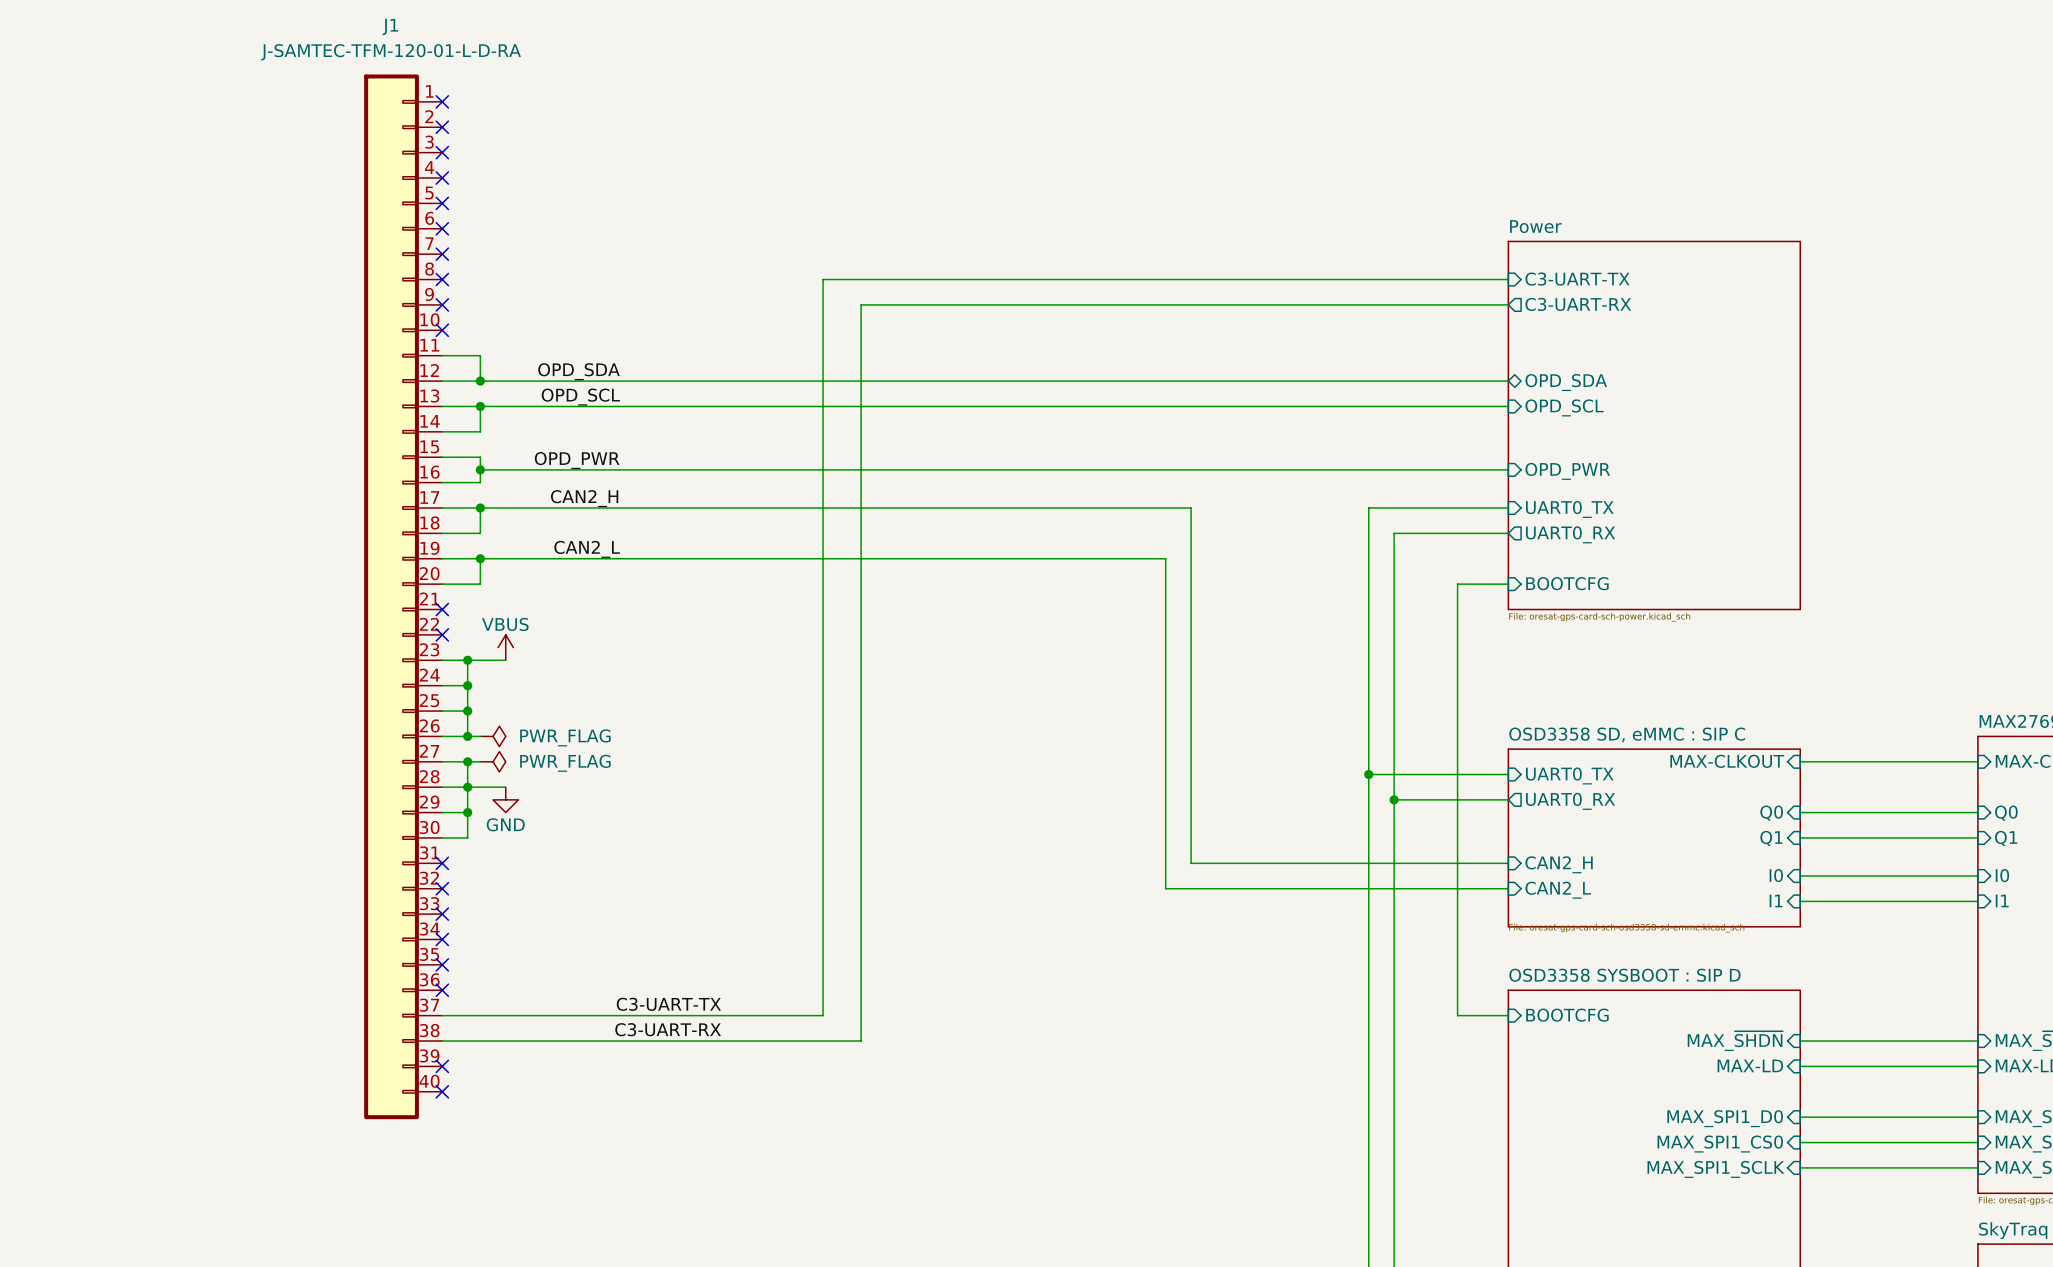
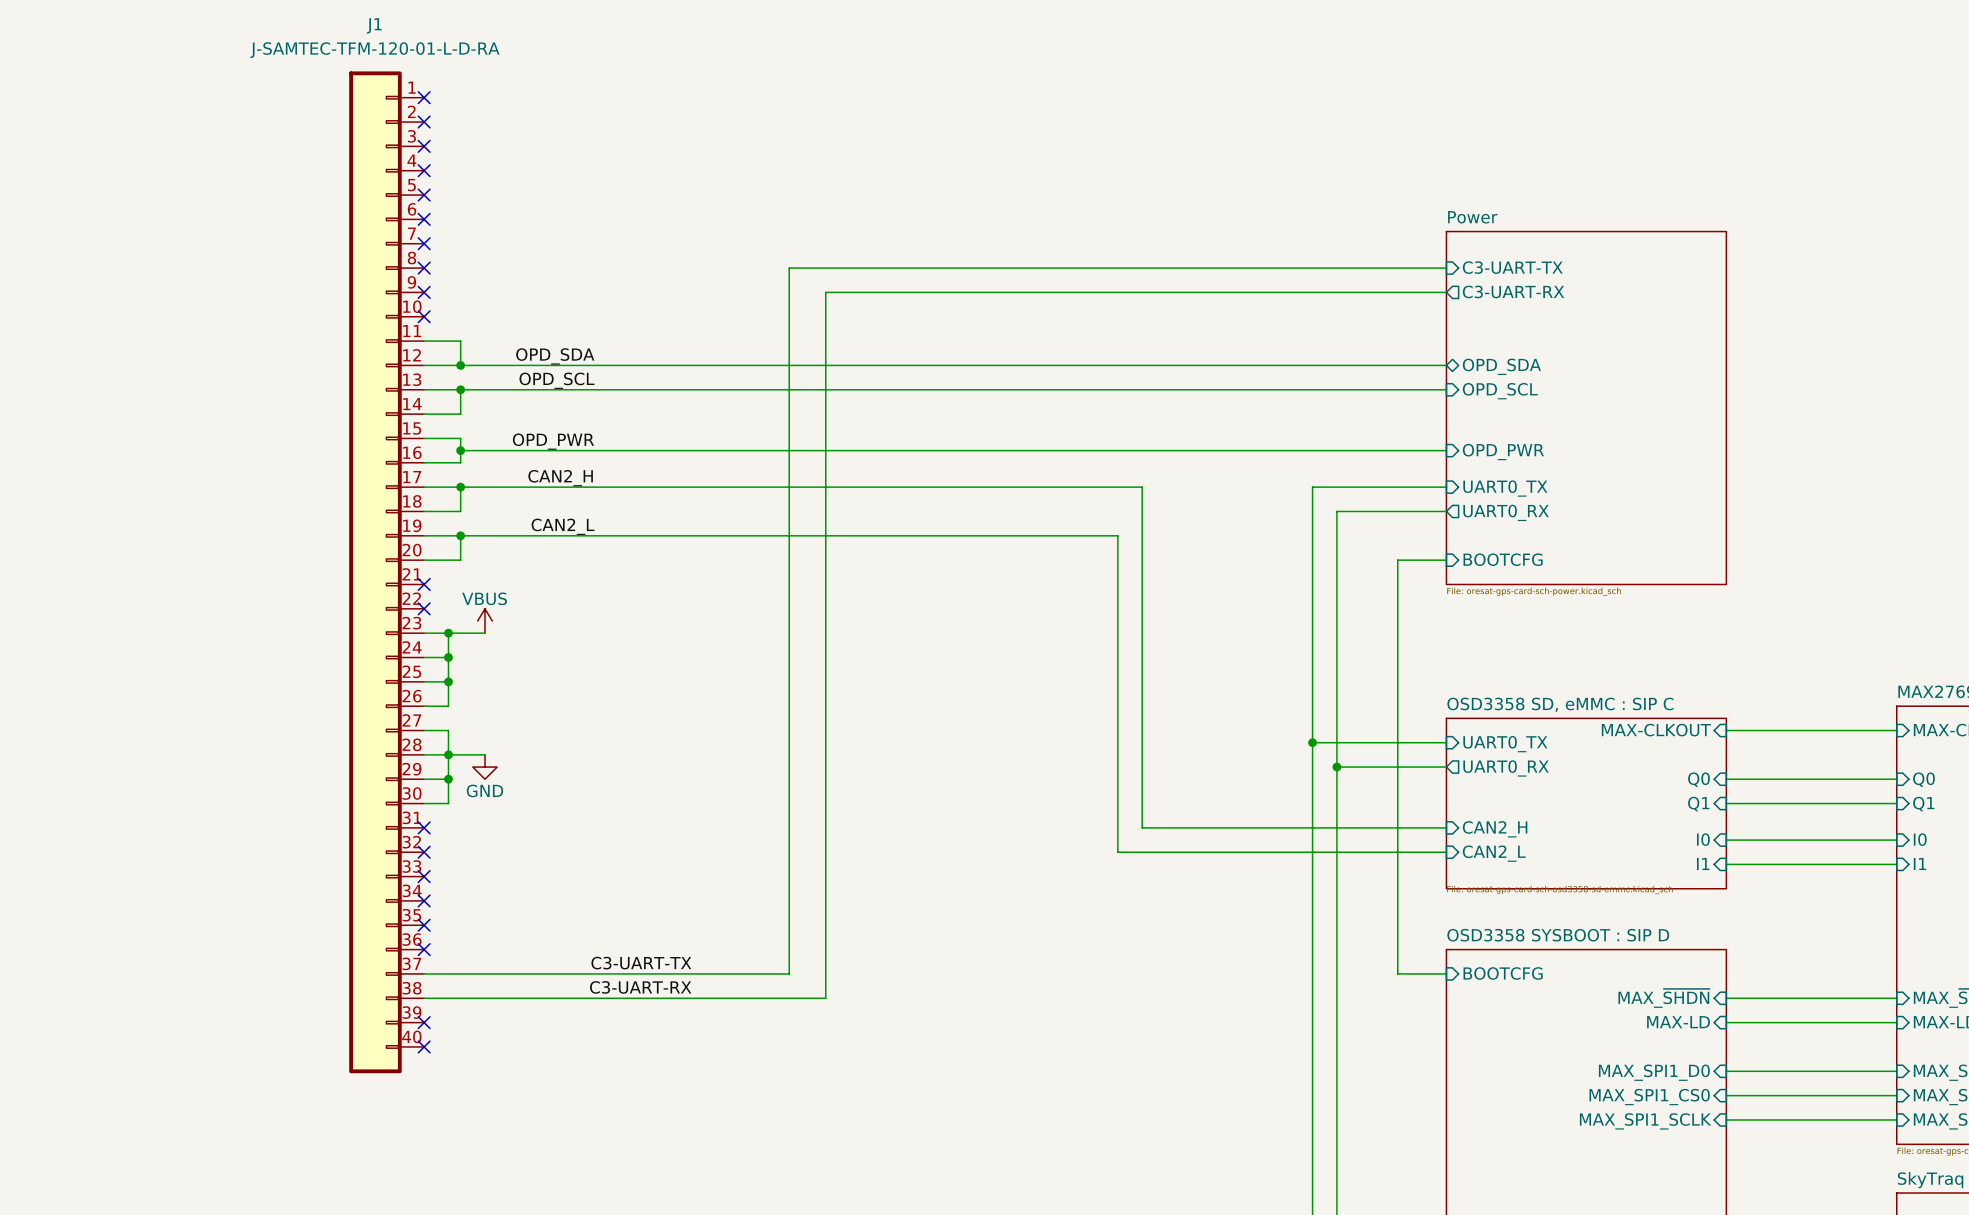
wire: (467, 736) (480, 736) -> none
junction: (467, 736) -> none
power symbol: PWR_FLAG (493, 736) -> none
wire: (467, 761) (480, 761) -> none
junction: (467, 761) -> none
power symbol: PWR_FLAG (493, 761) -> none

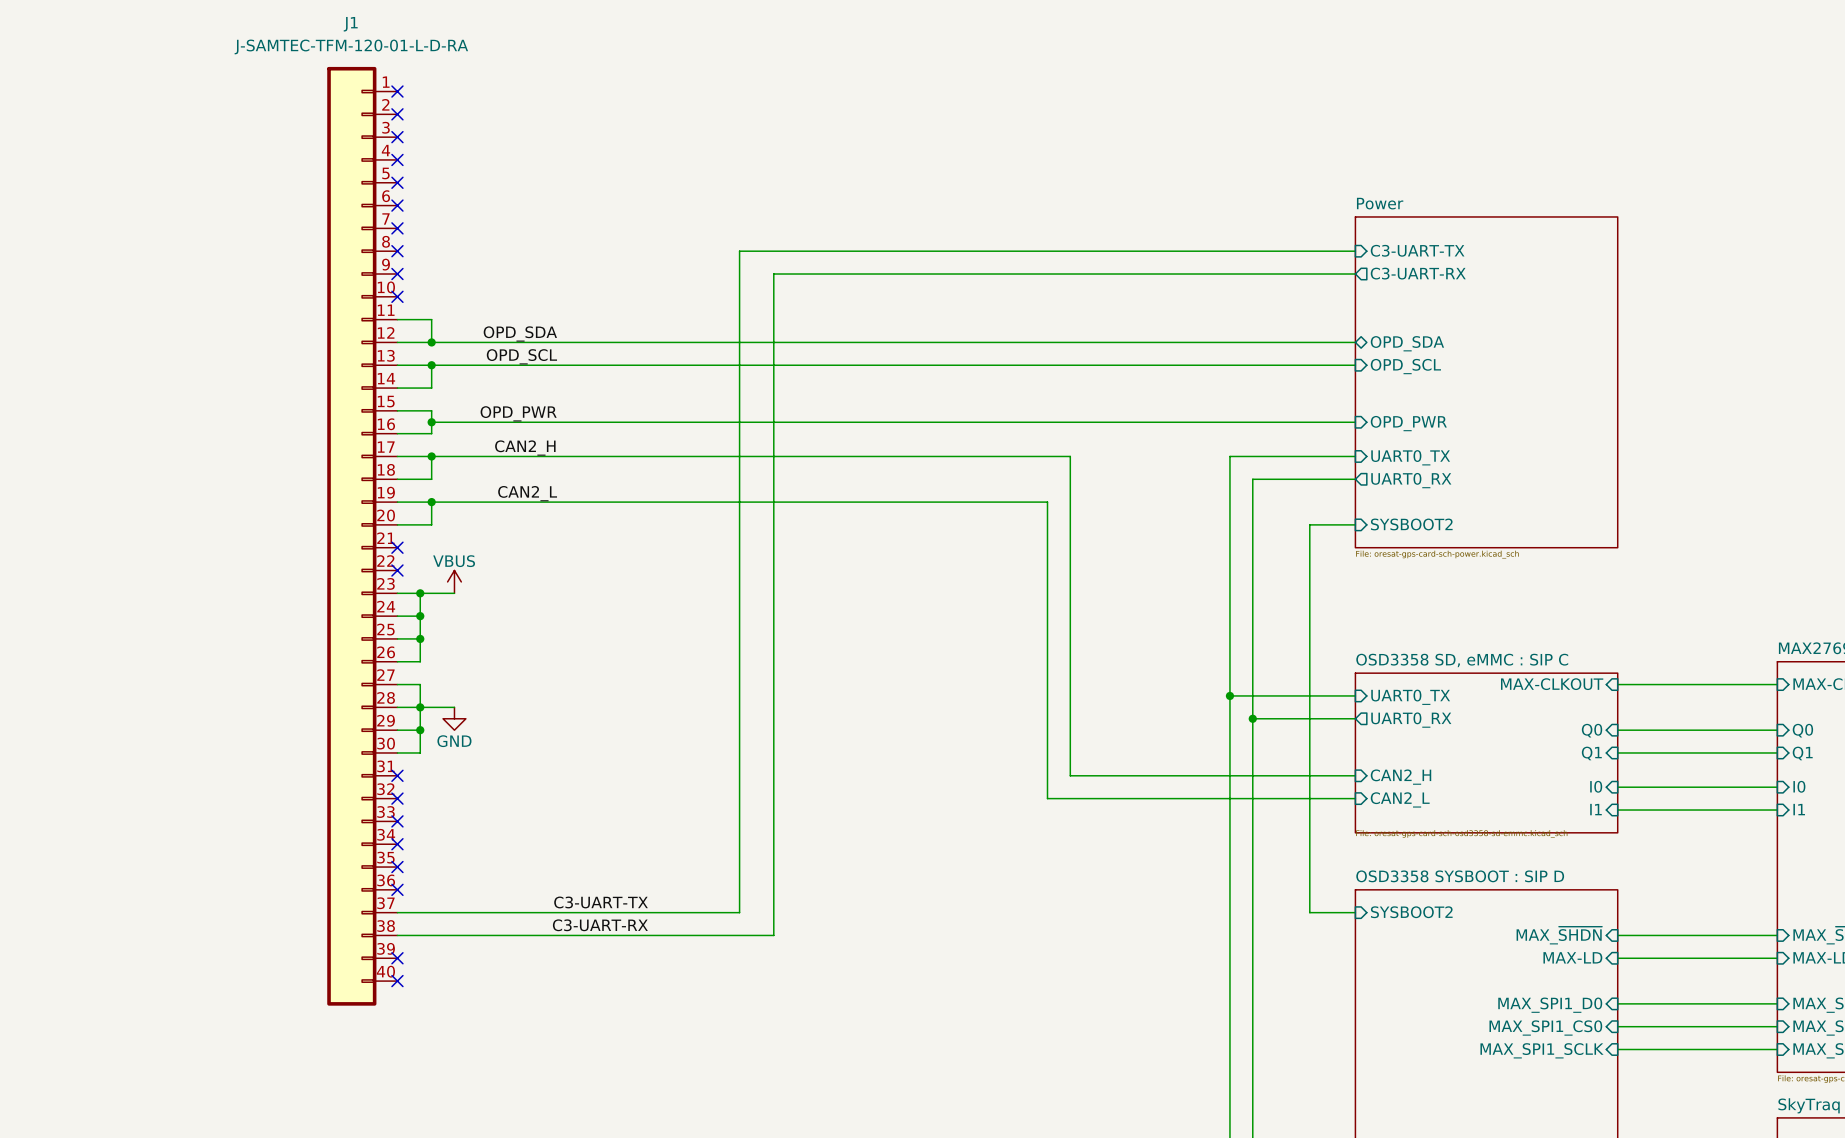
sheet pin: BOOTCFG (1503, 559) -> SYSBOOT2 (1411, 524)
sheet pin: BOOTCFG (1503, 973) -> SYSBOOT2 (1411, 912)

